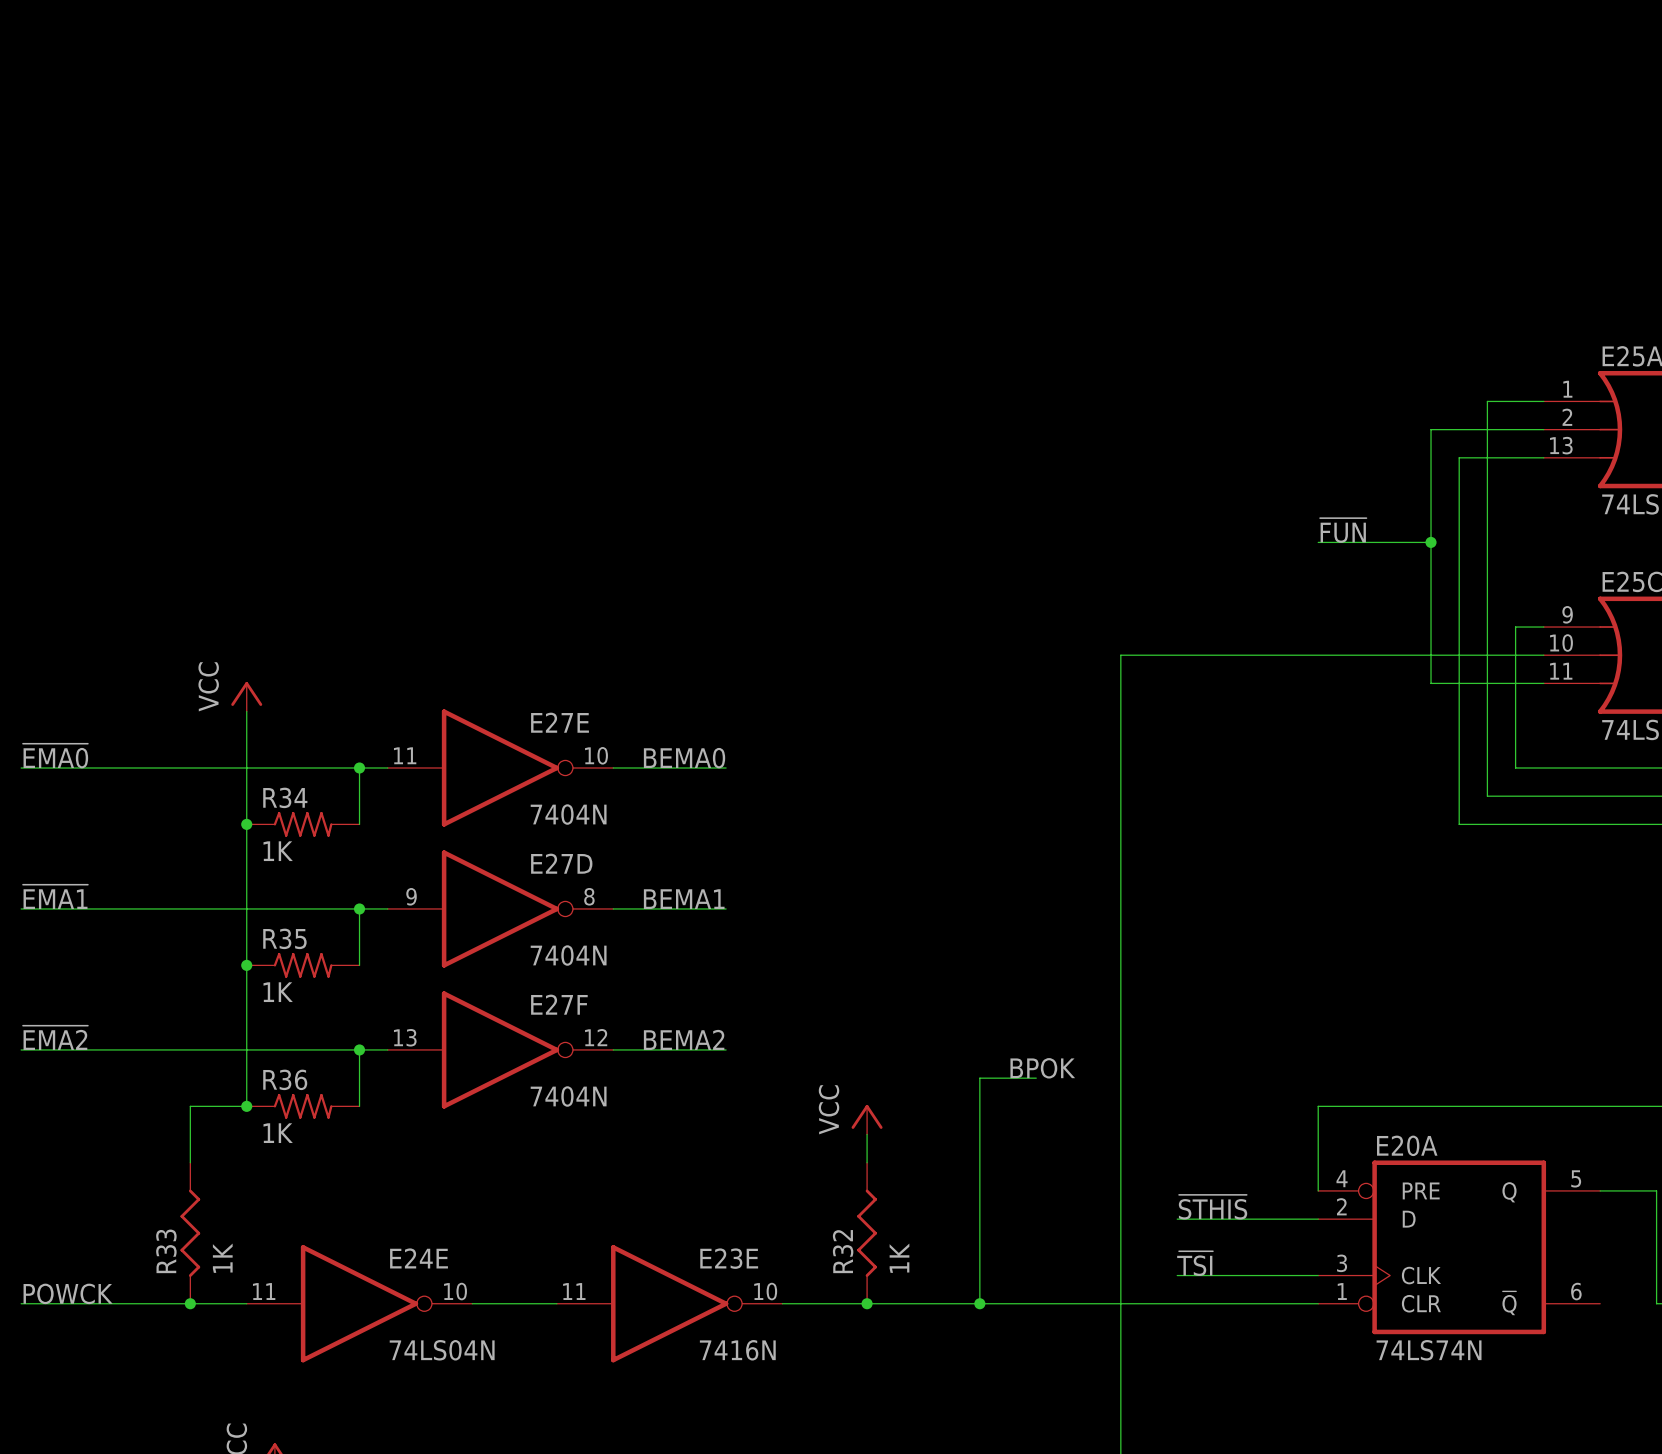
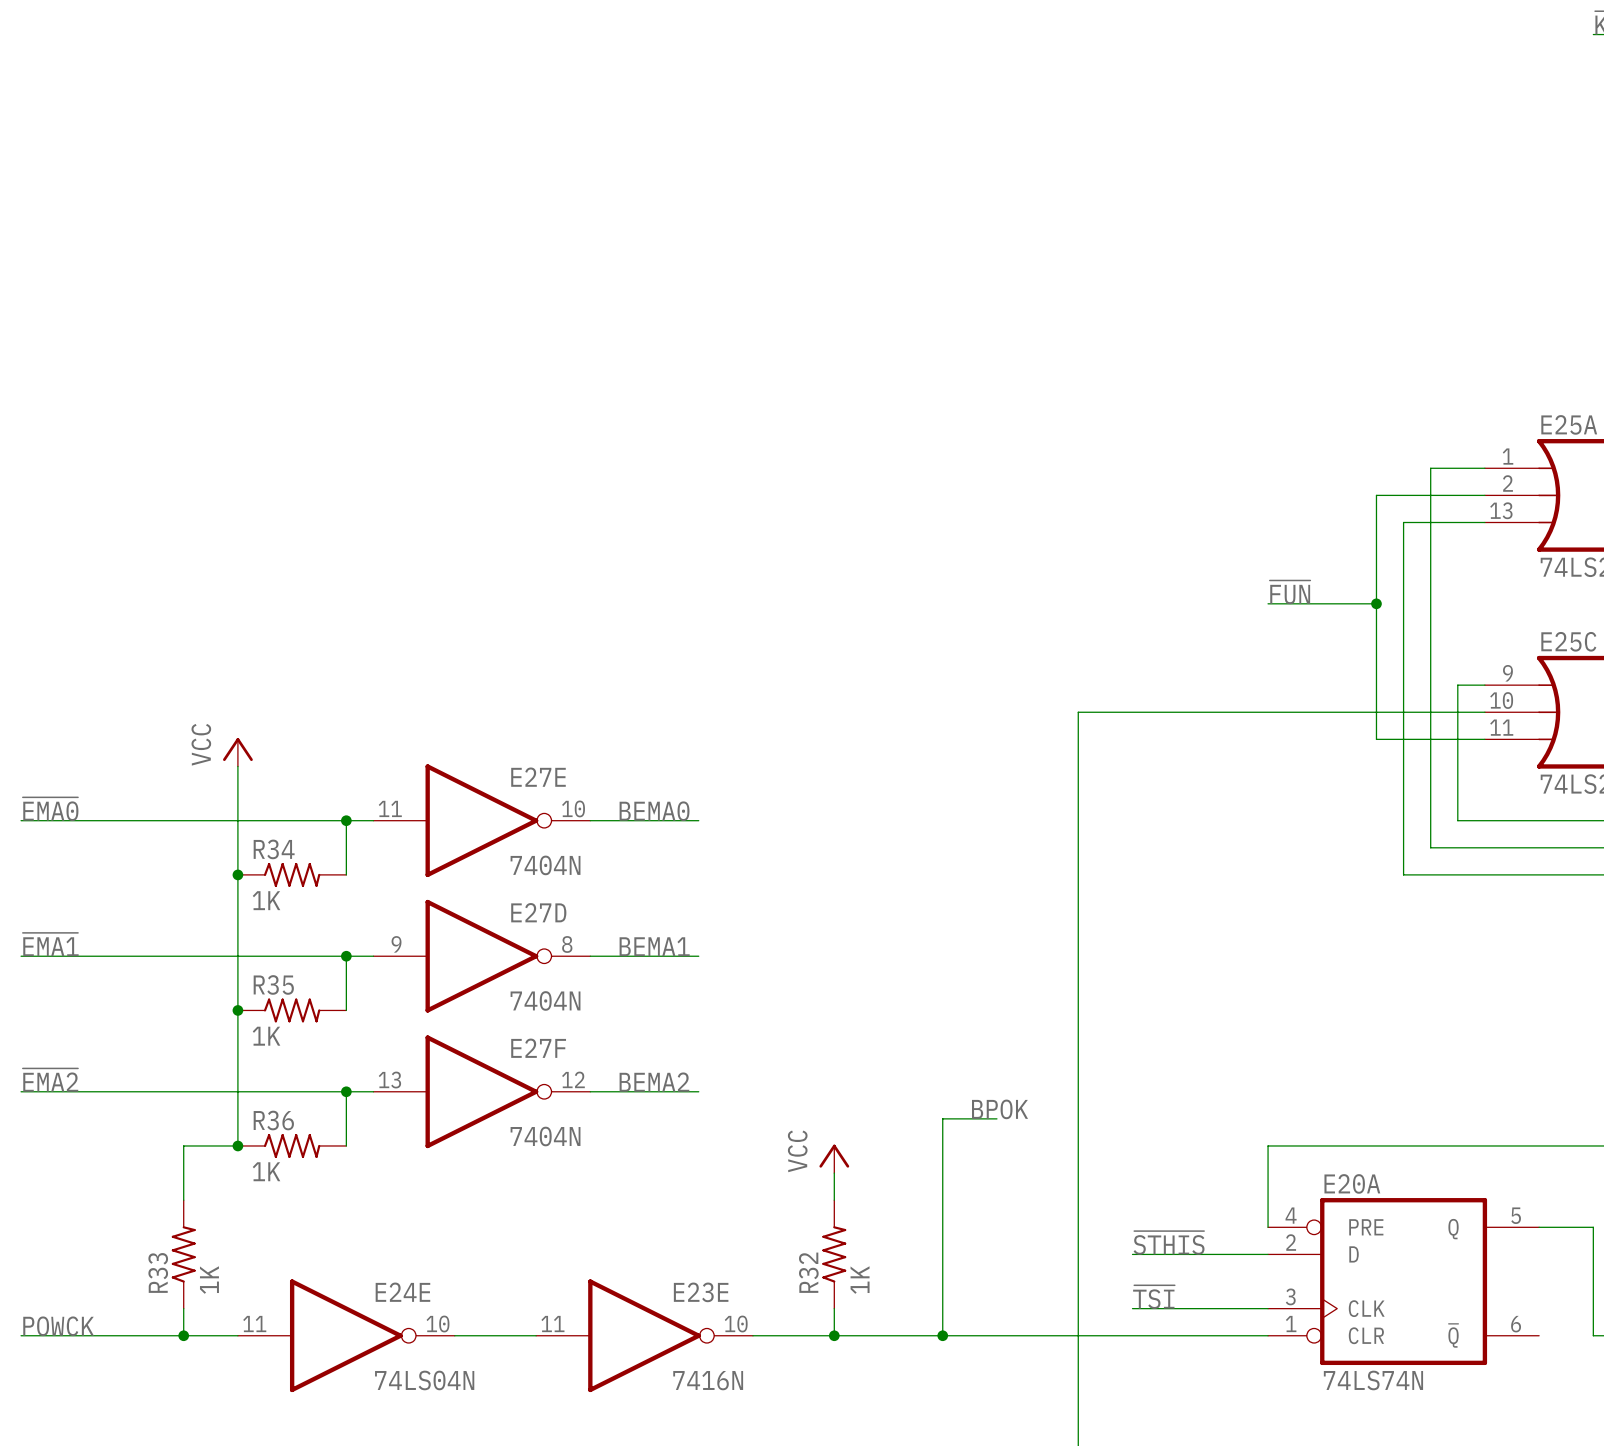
R33 symbol: [180, 1162, 201, 1304] -> [171, 1200, 196, 1309]
R32 symbol: [857, 1162, 877, 1304] -> [822, 1200, 847, 1309]

